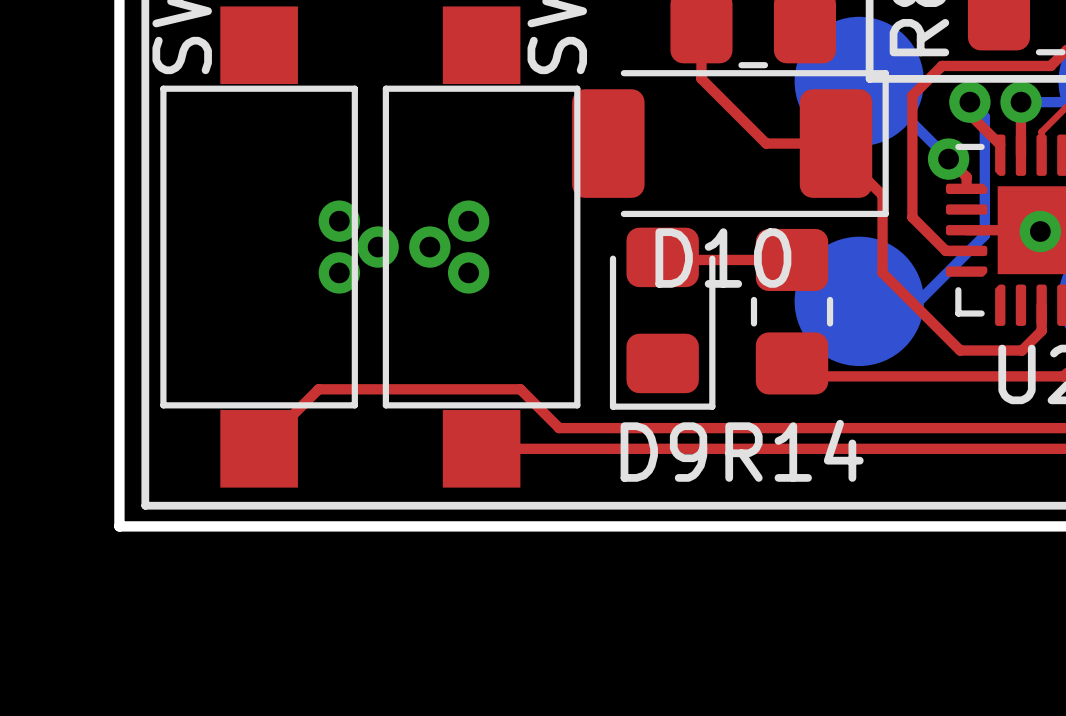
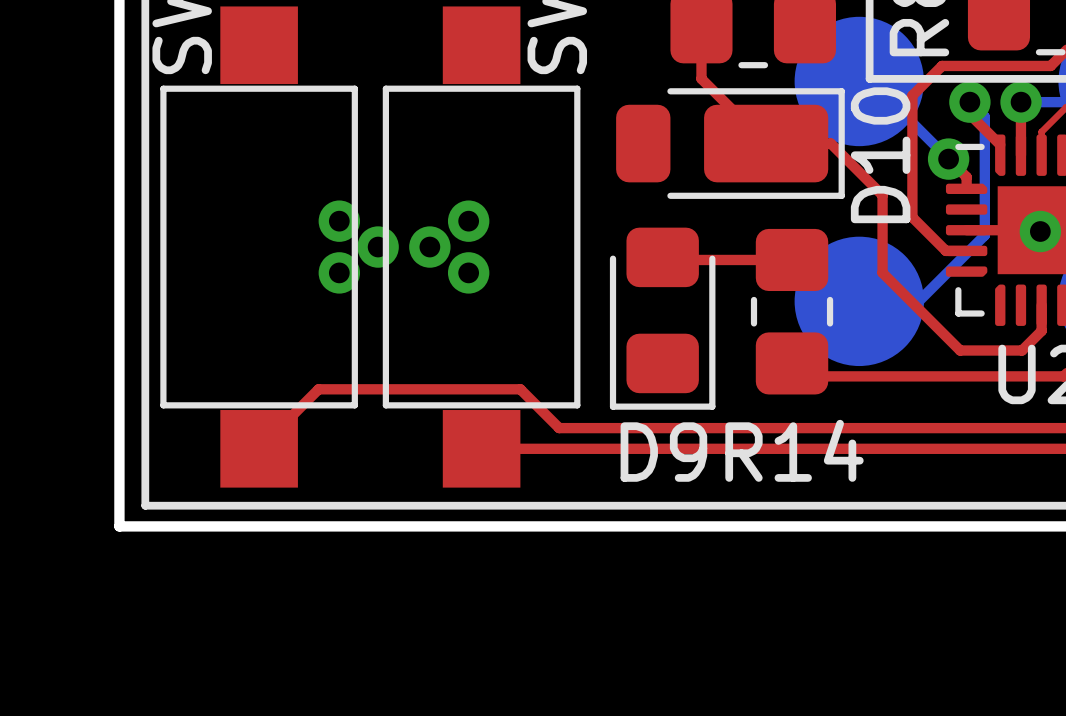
D10 footprint: [572, 70, 889, 218] -> [616, 88, 845, 199]
D10 name position: D10 (723, 258) -> D10 (880, 155)

